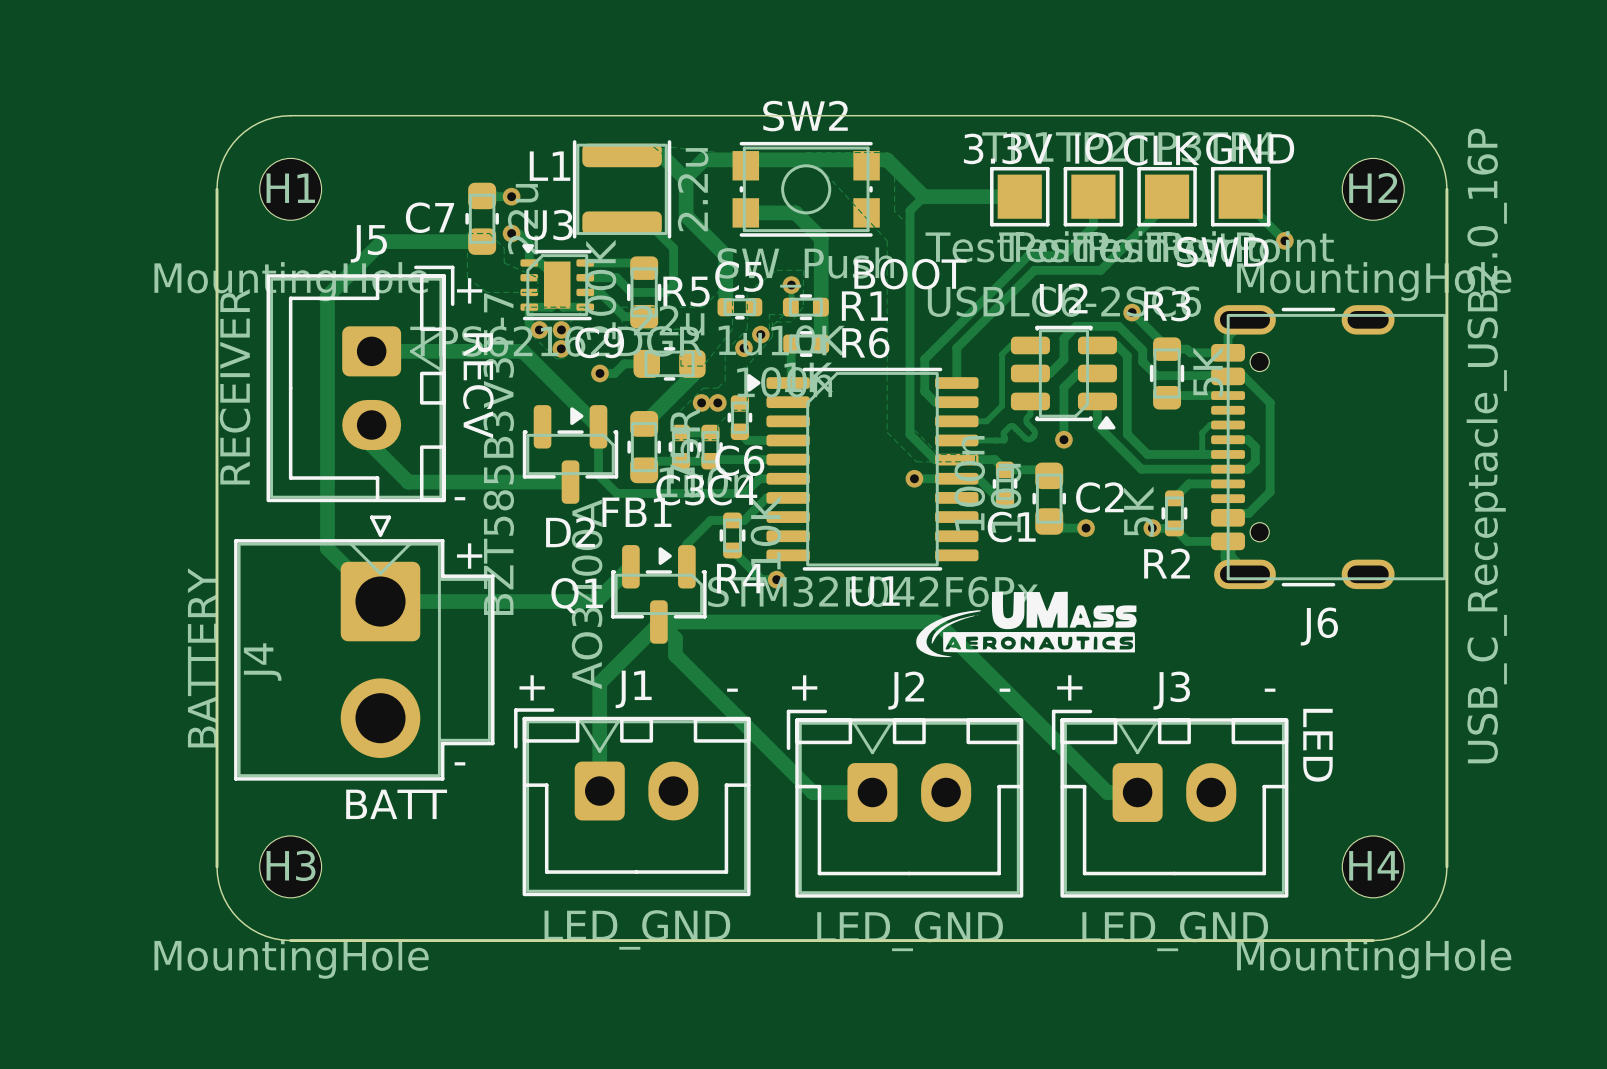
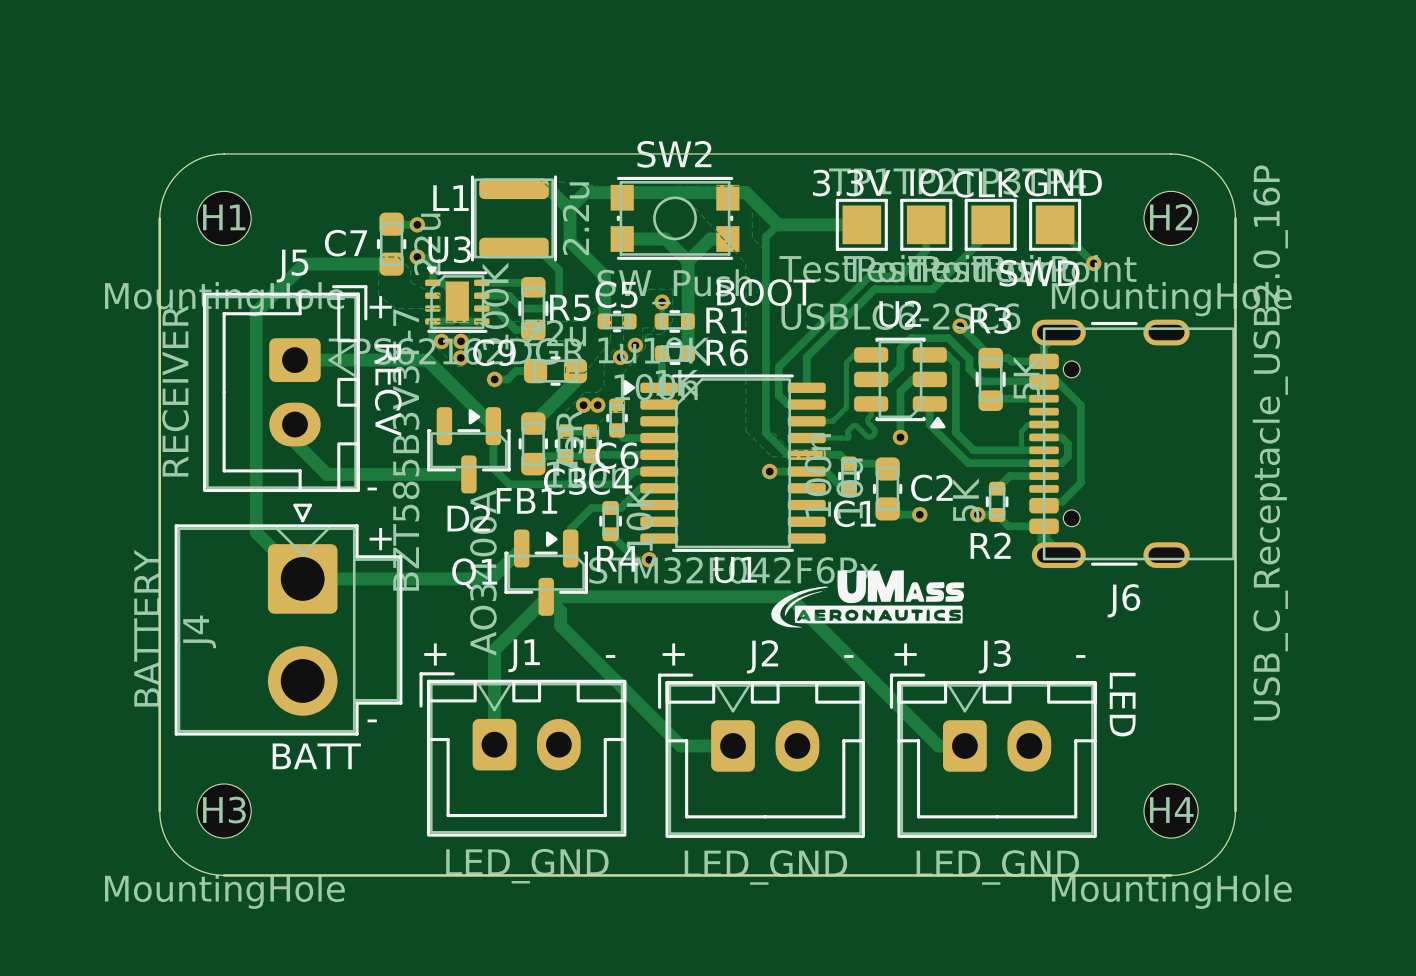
track: none -> (727, 239) (710, 239) (688, 261)

